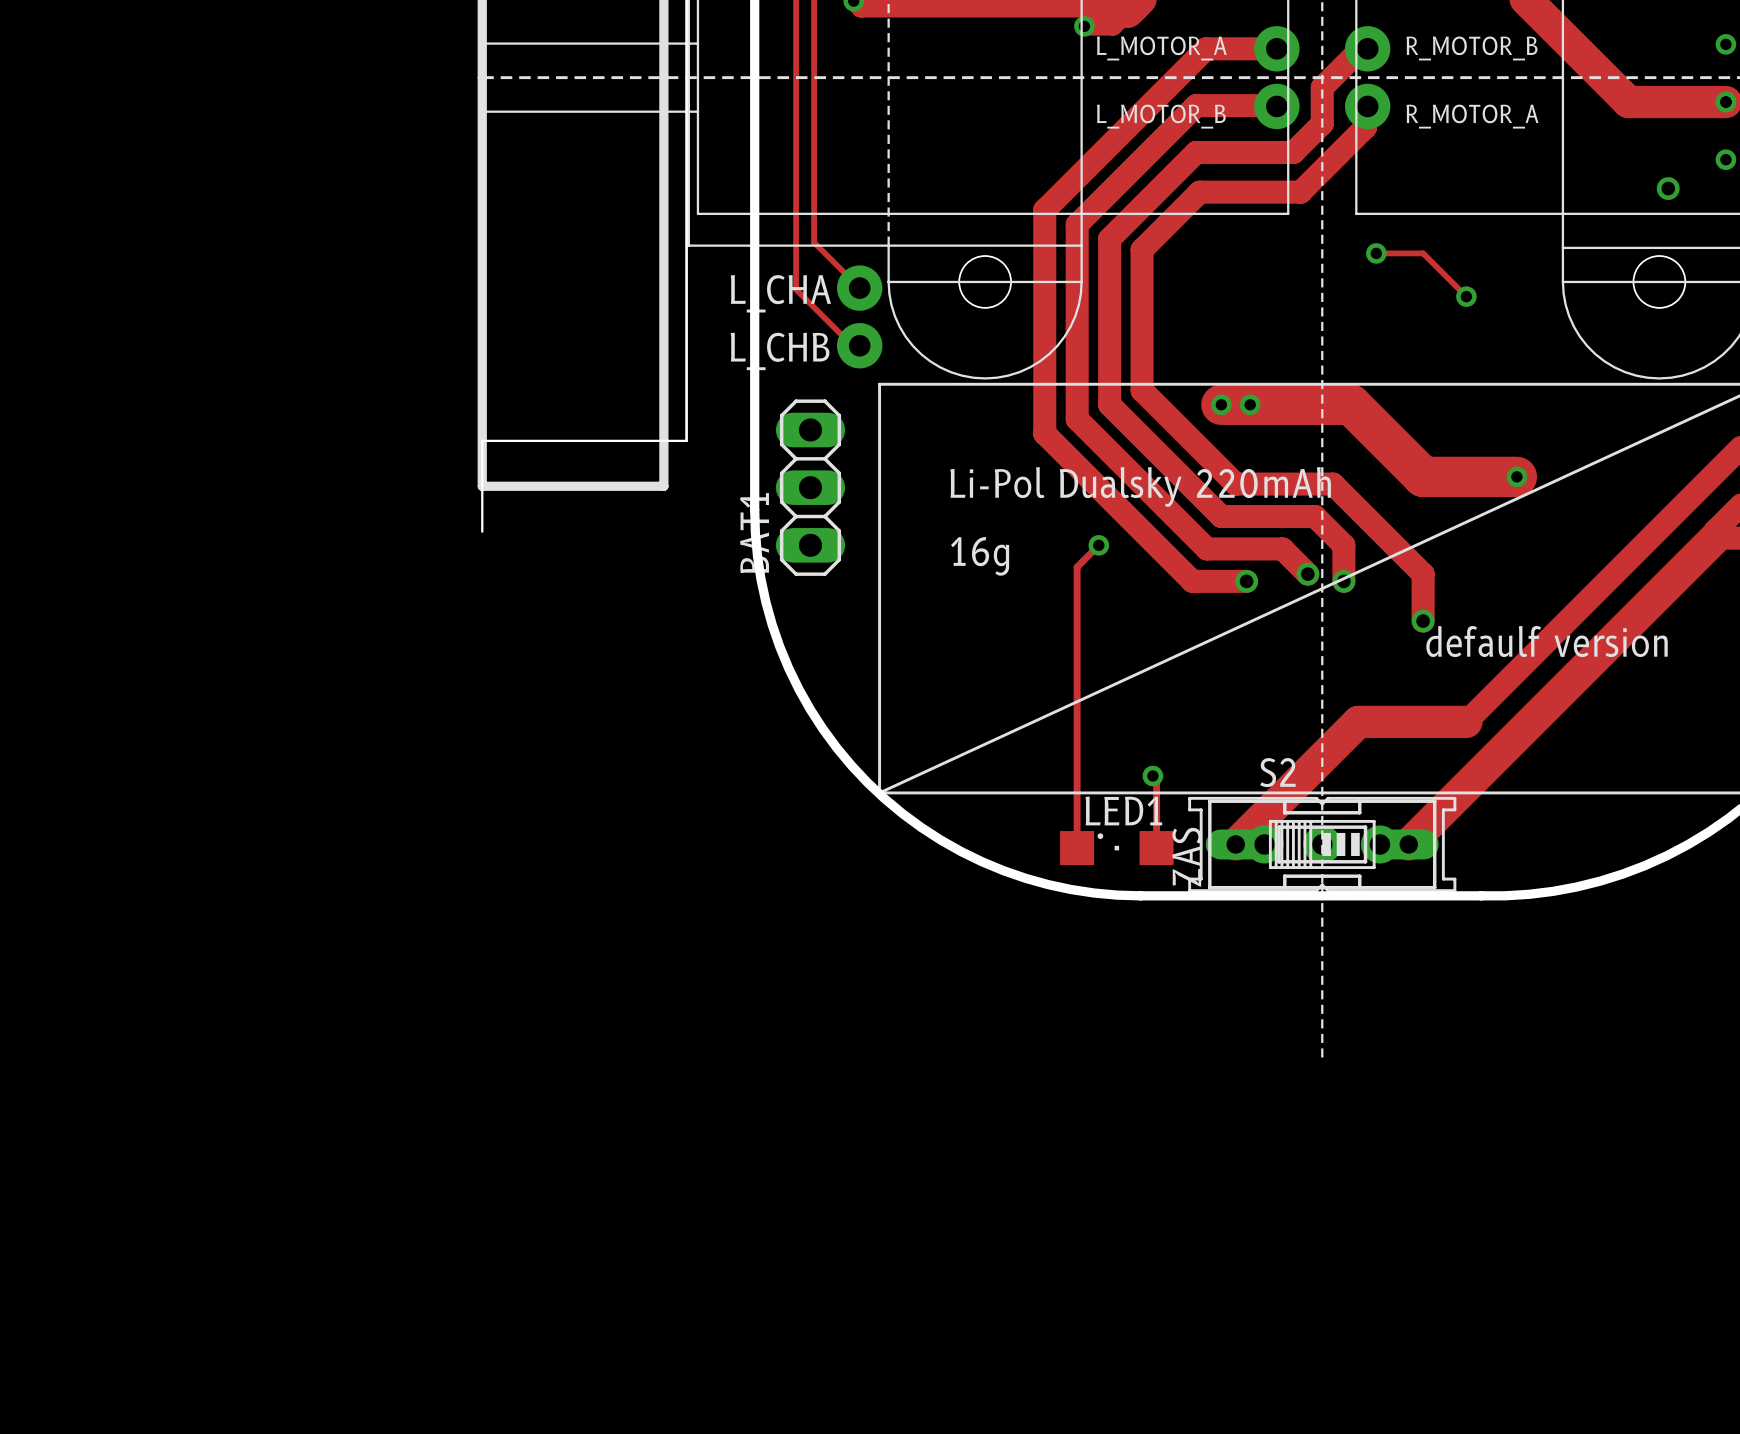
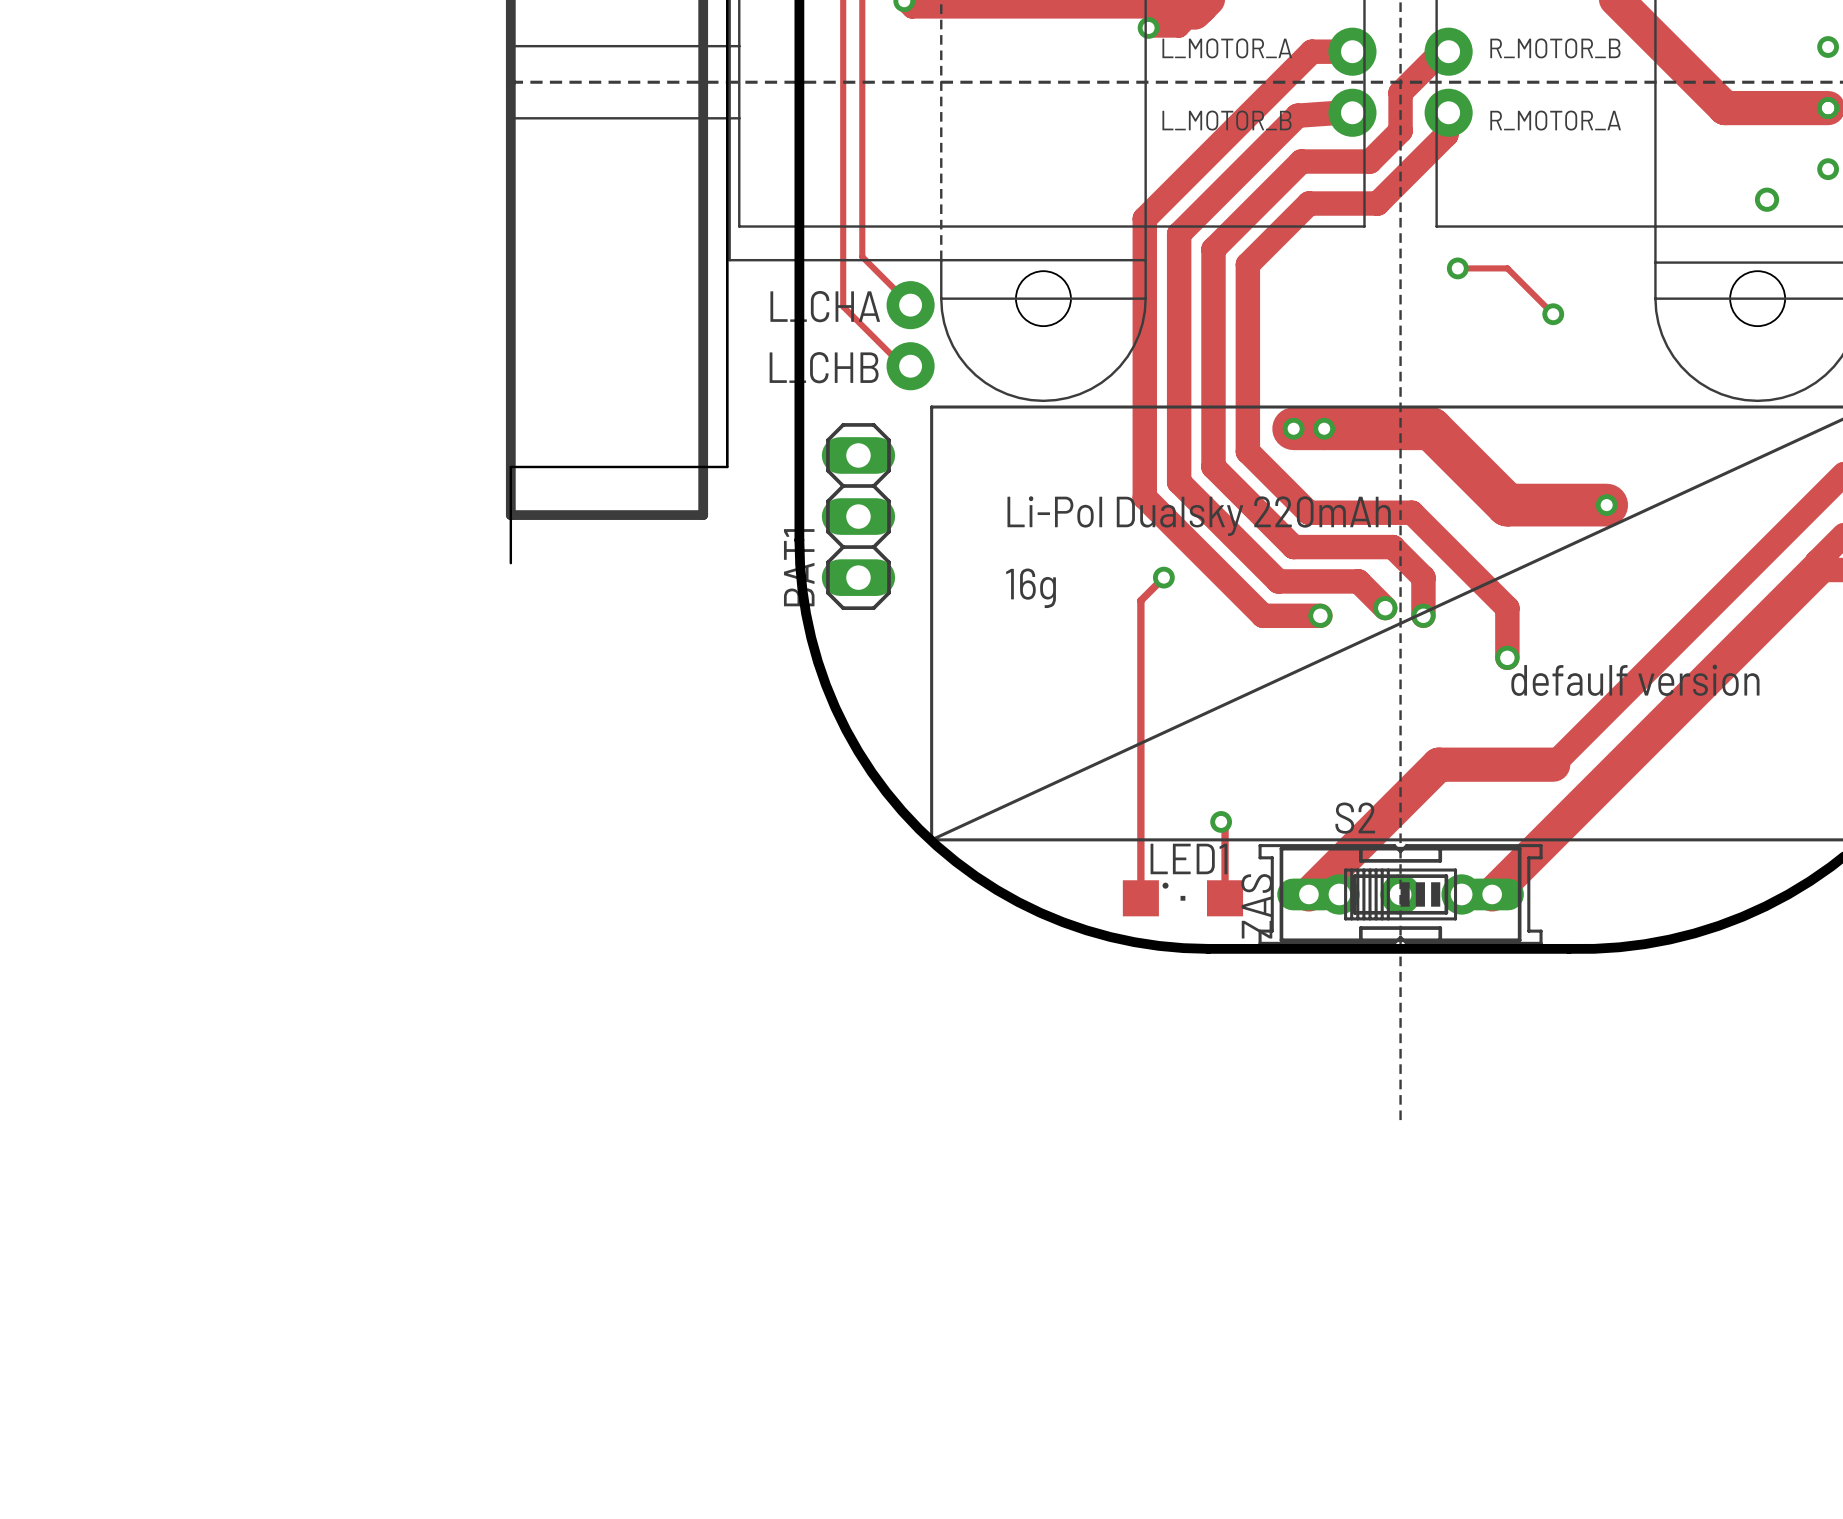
track: (1238, 48) (1206, 48) (1044, 210) (1044, 433) (1080, 469) -> (1311, 51) (1144, 218) (1144, 497)
track: (1276, 105) (1196, 105) (1077, 224) (1077, 419) (1113, 455) -> (1351, 111) (1297, 115) (1179, 234) (1179, 482)
track: (1228, 152) (1196, 152) (1109, 239) (1109, 404) (1145, 440) -> (1301, 161) (1213, 249) (1213, 466)
track: (1235, 192) (1199, 192) (1142, 249) (1142, 390) (1178, 426) -> (1308, 203) (1247, 264) (1247, 451)

